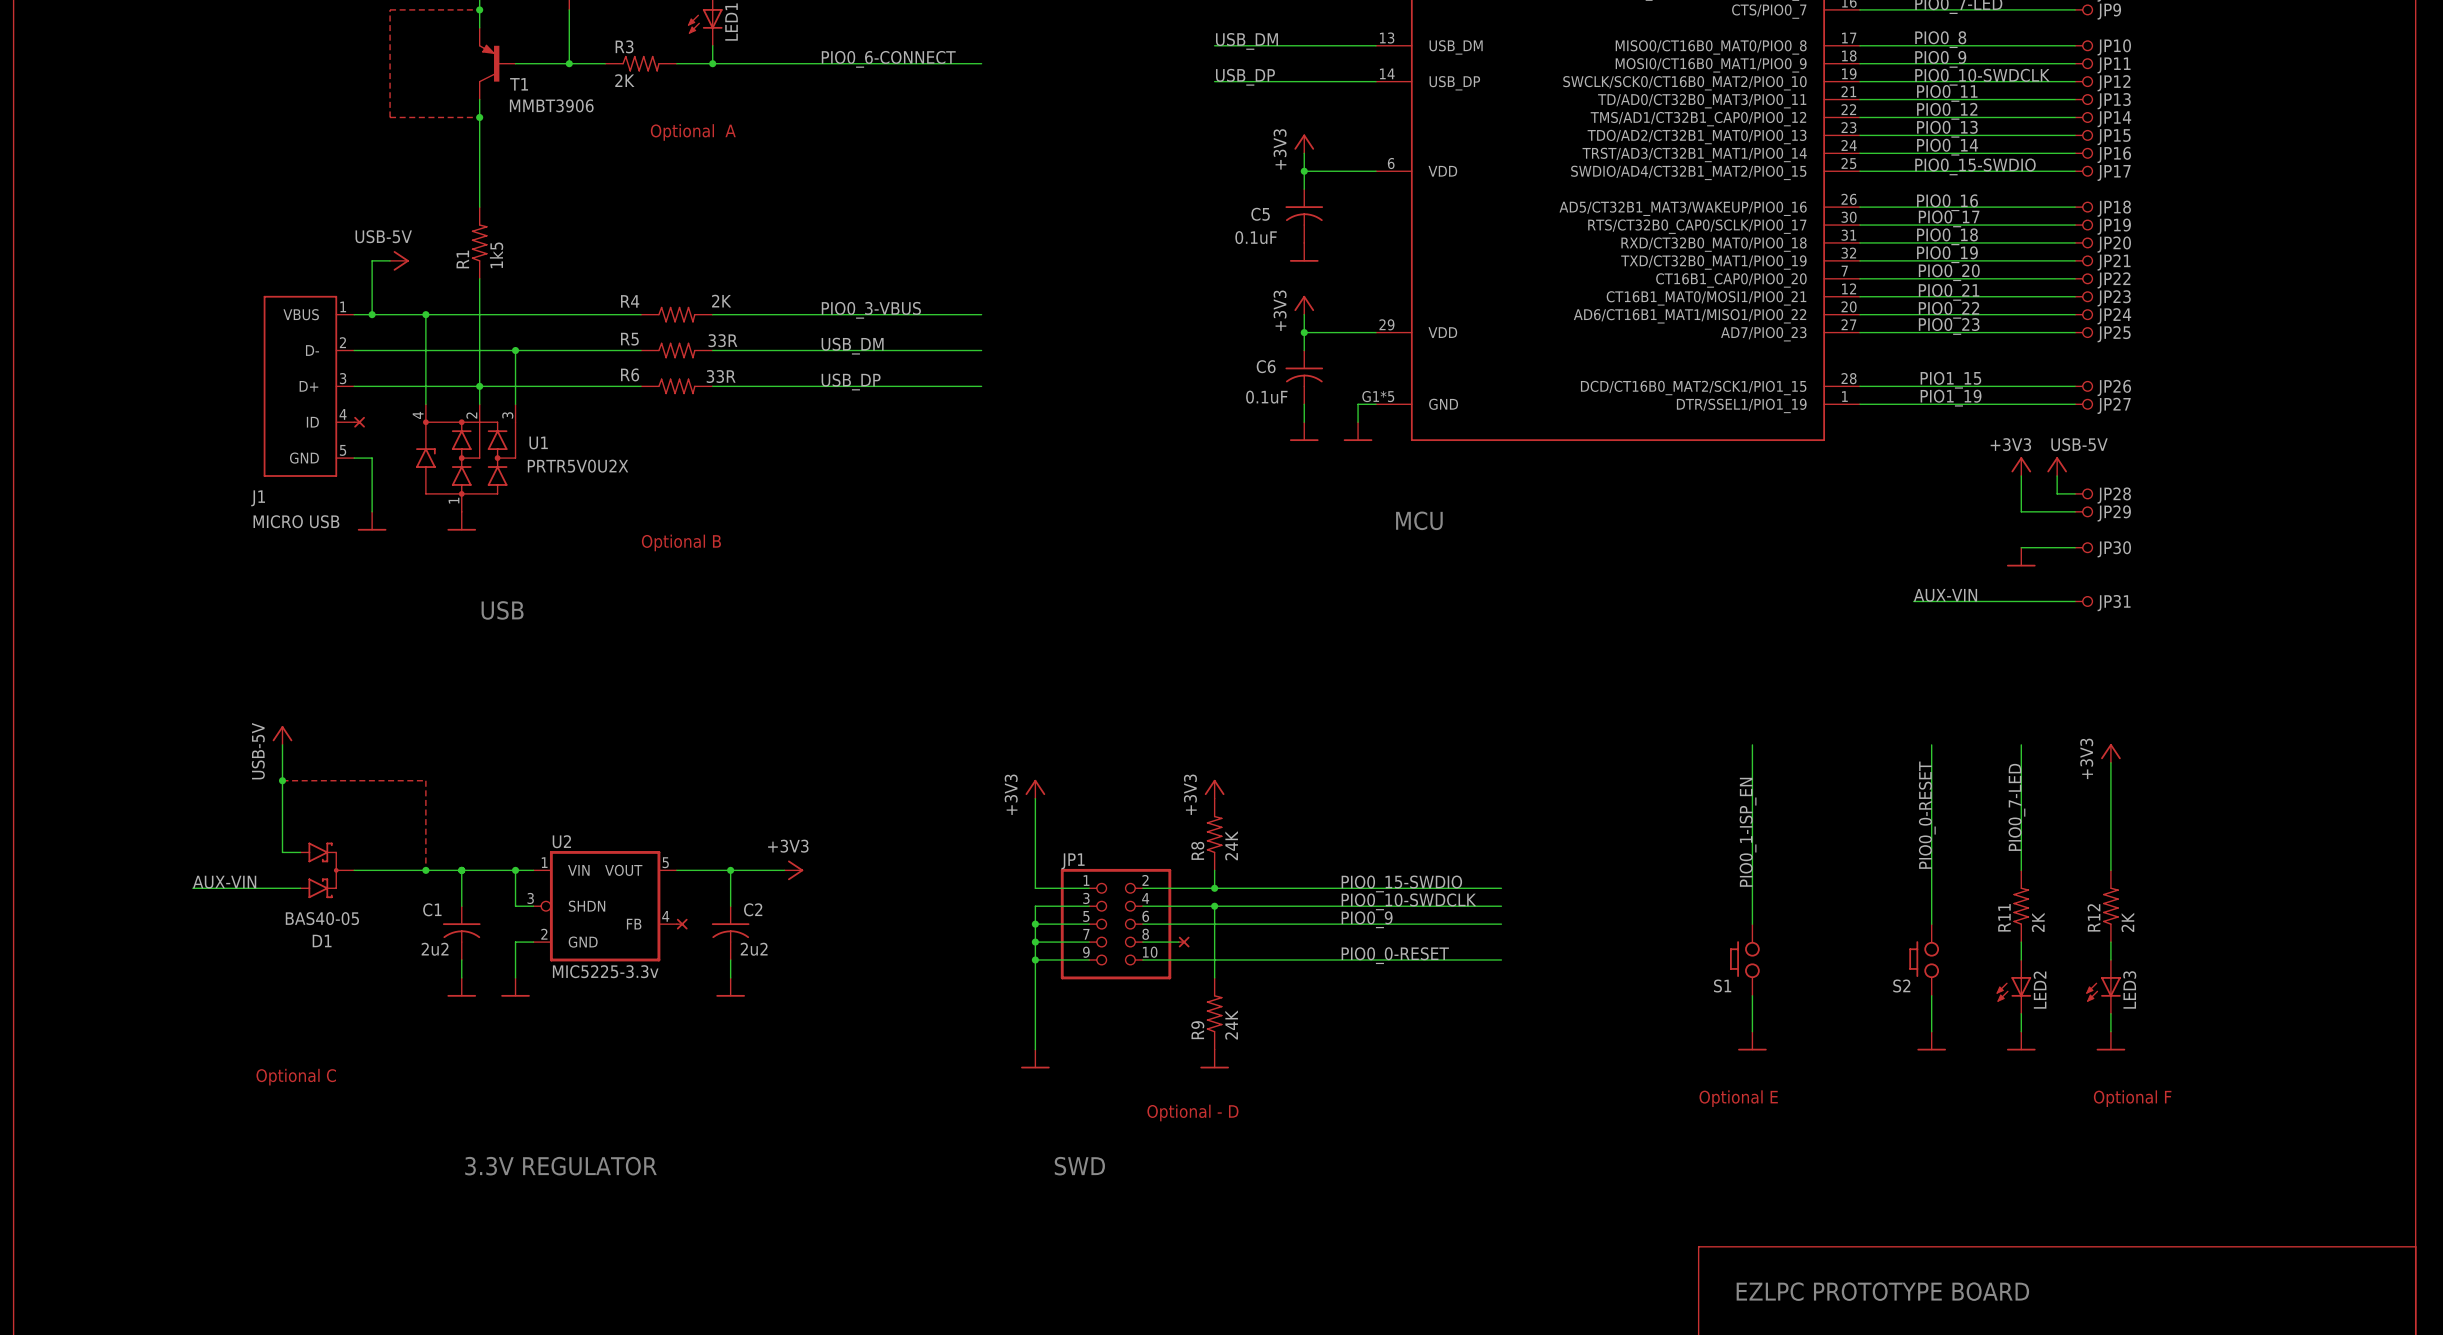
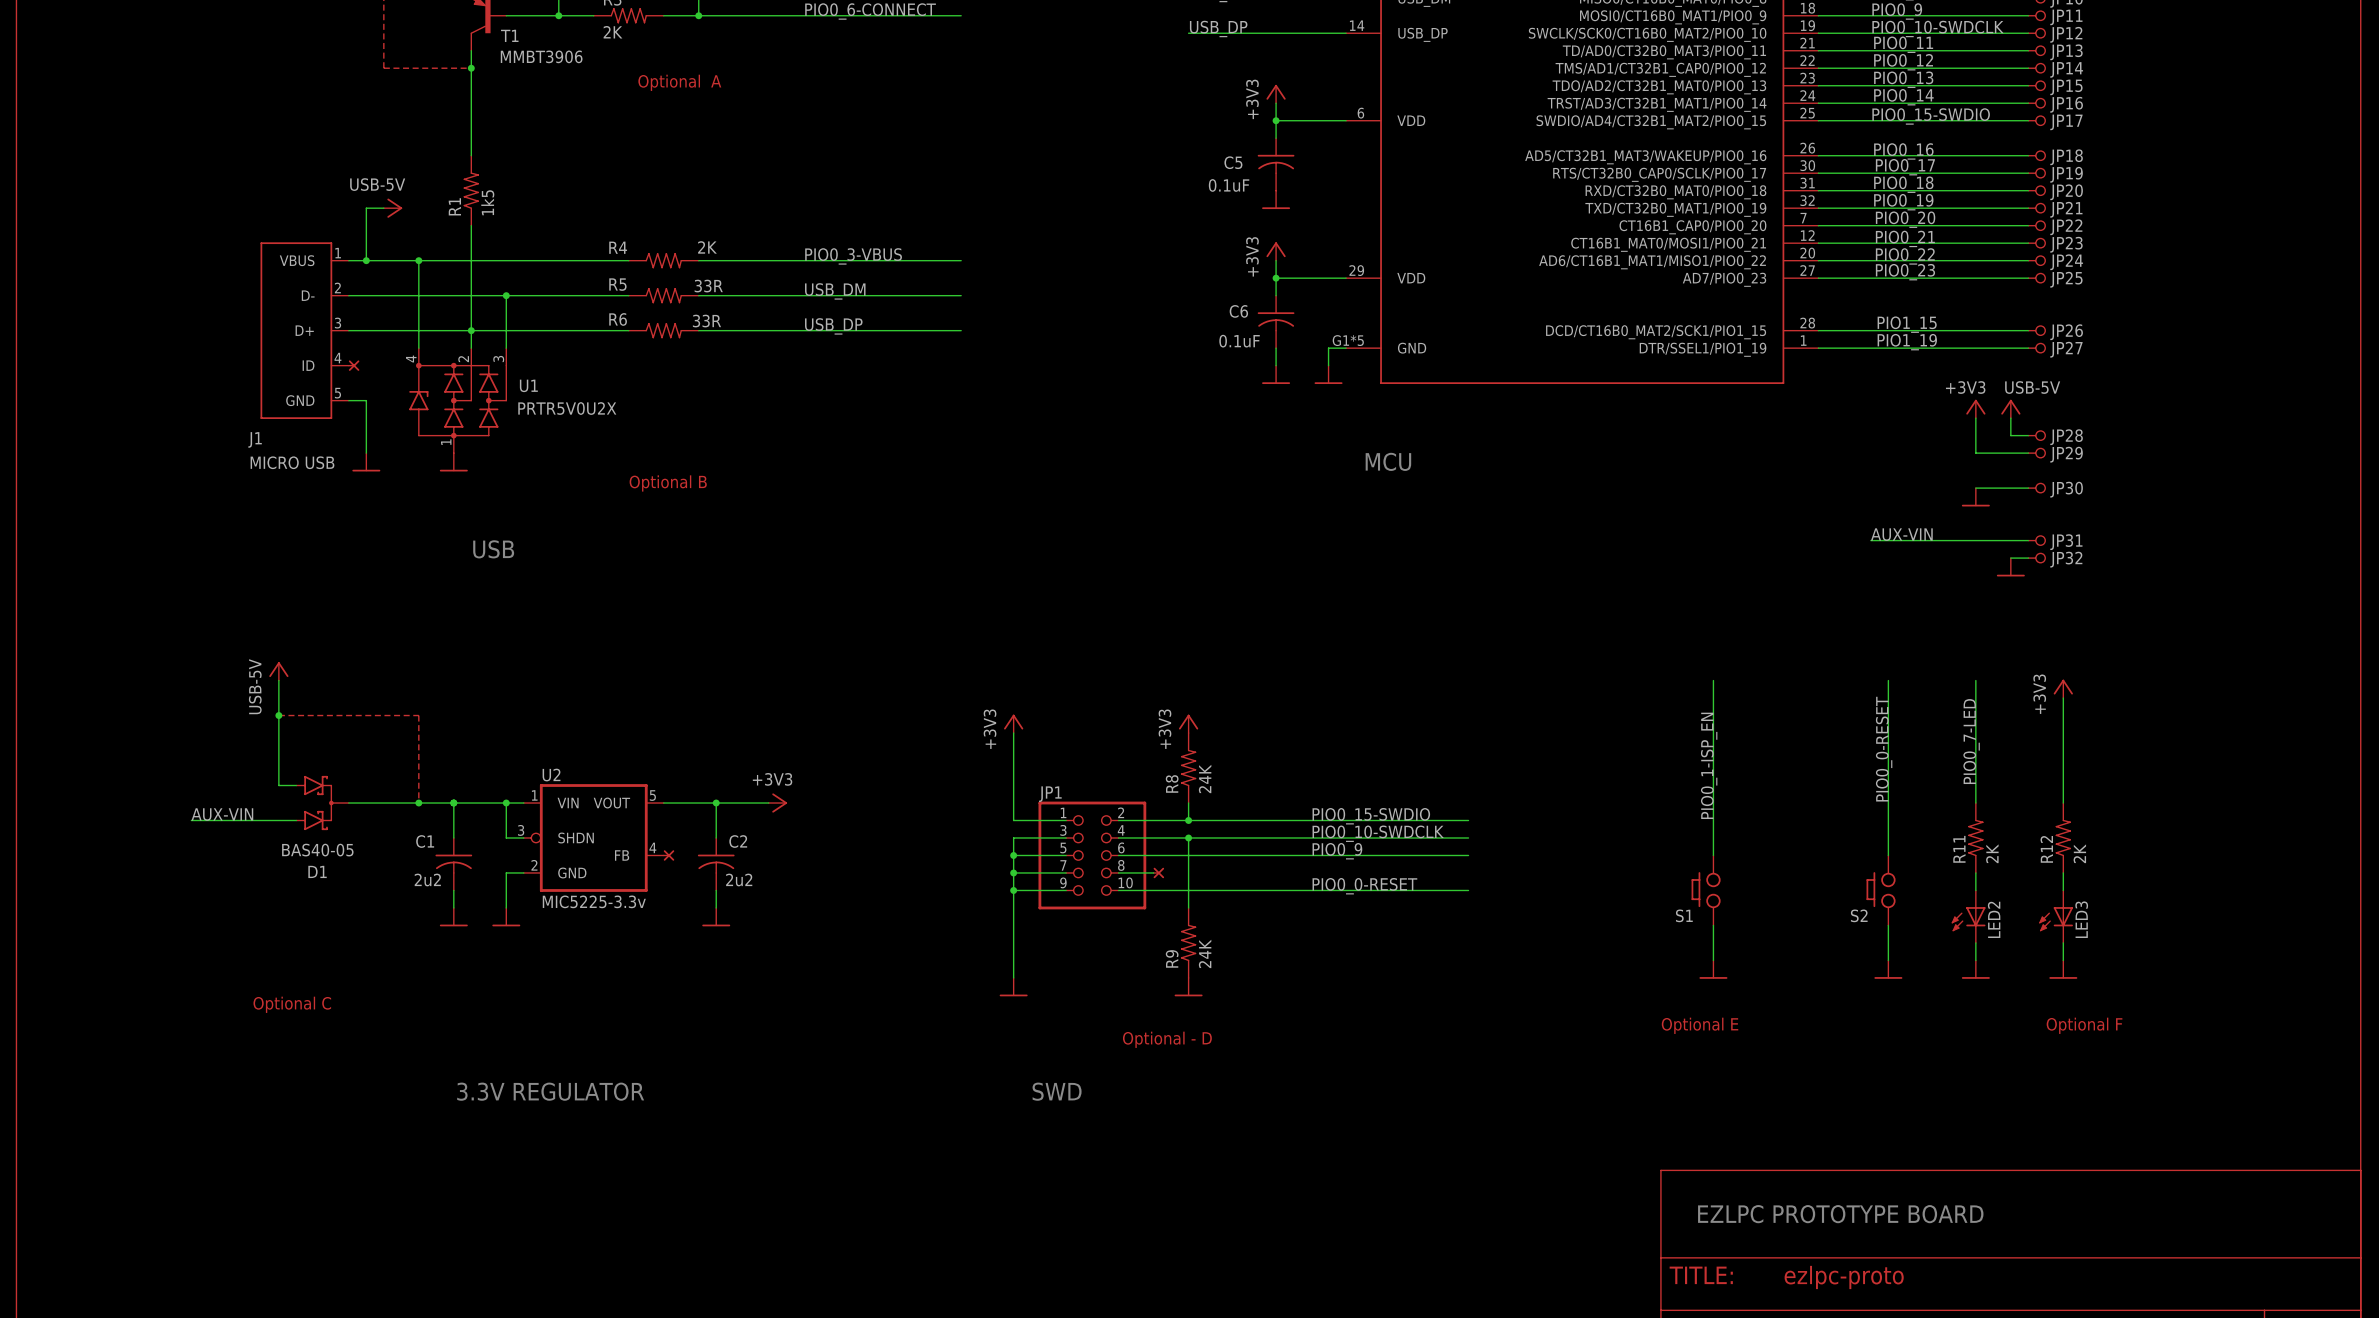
wire: none -> (2010, 558) (2028, 558)
JP32: none -> (2036, 558)
power symbol: none -> (2010, 567)

